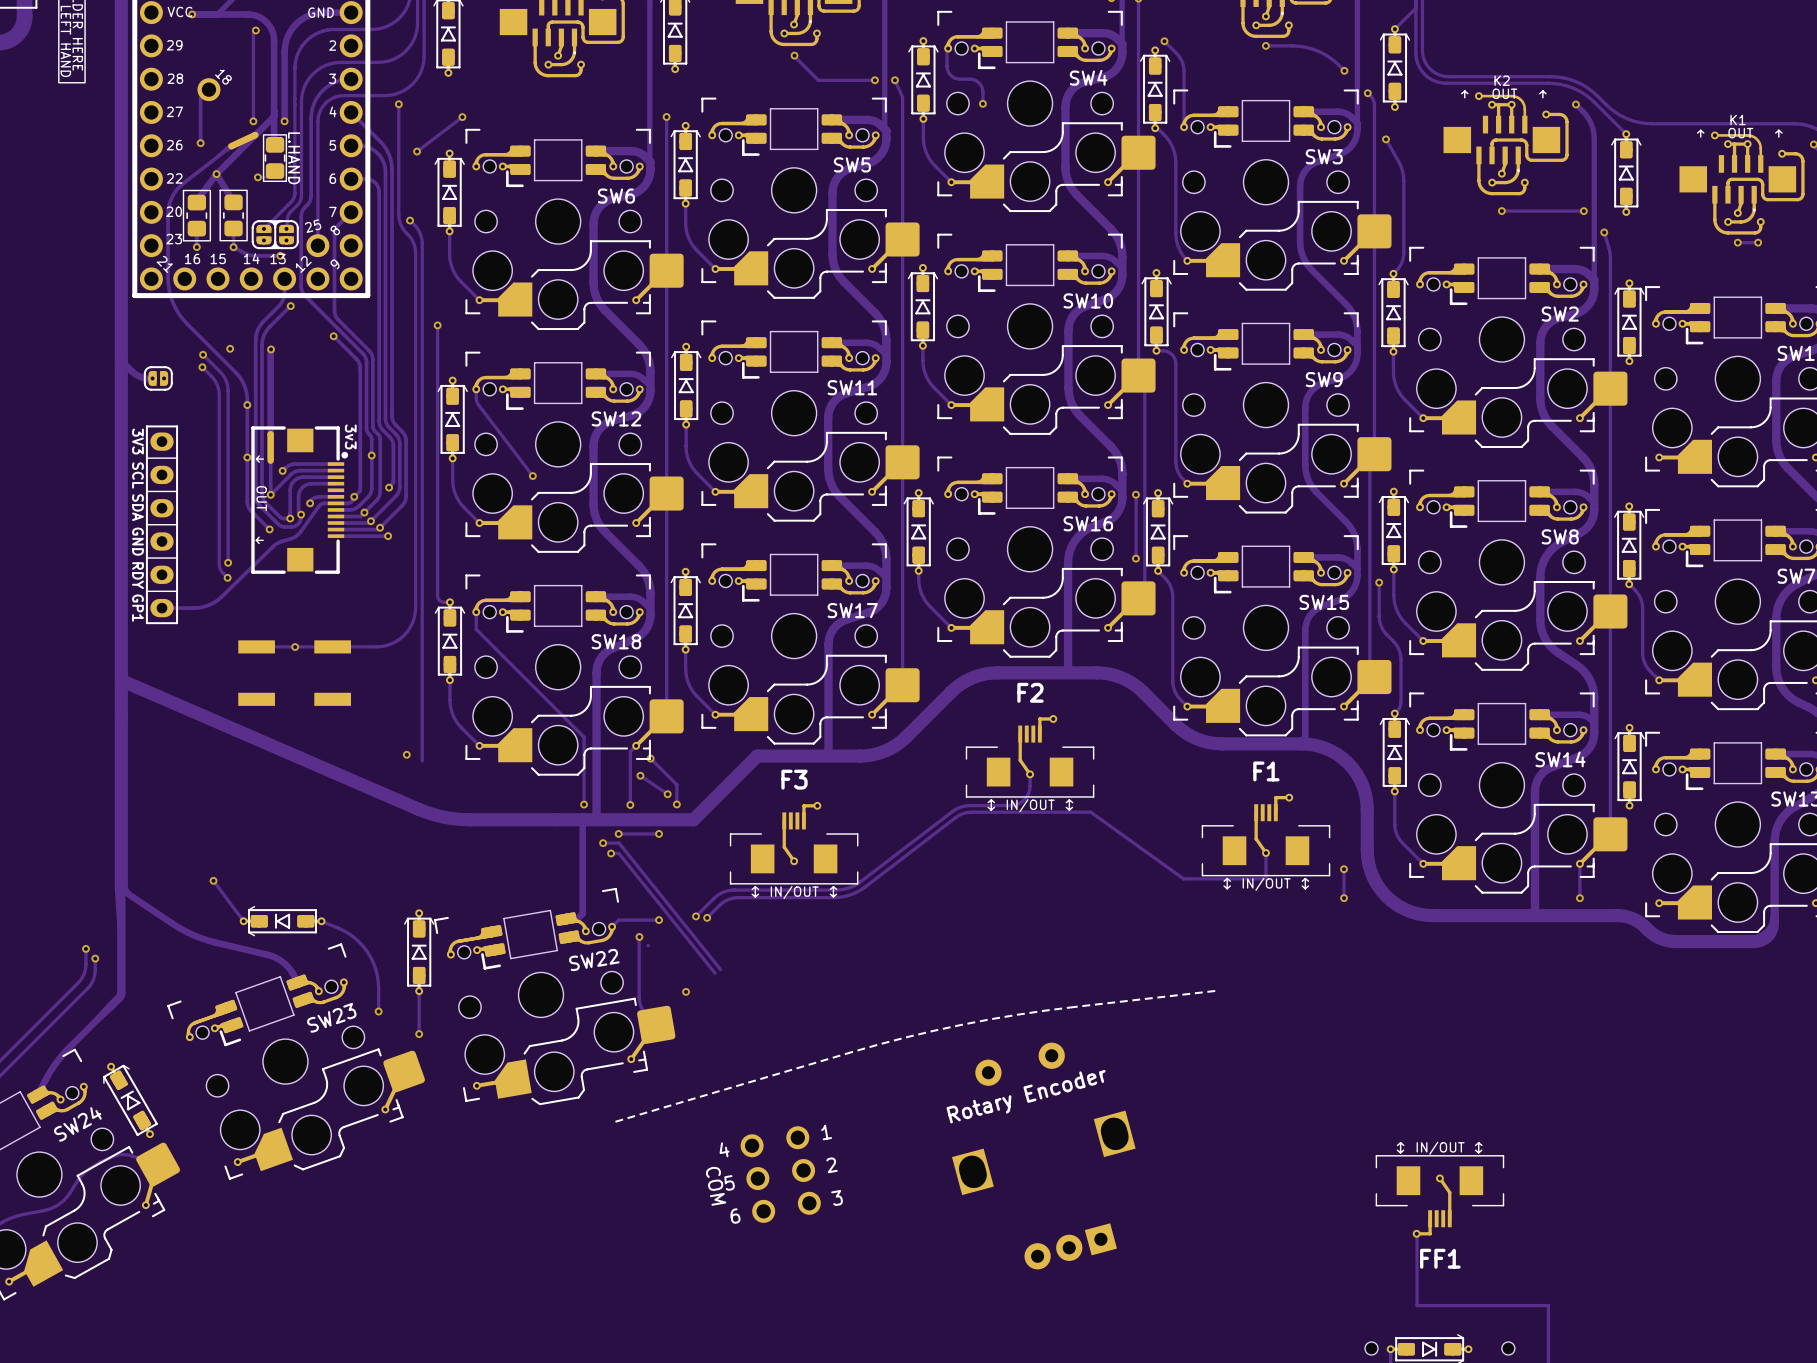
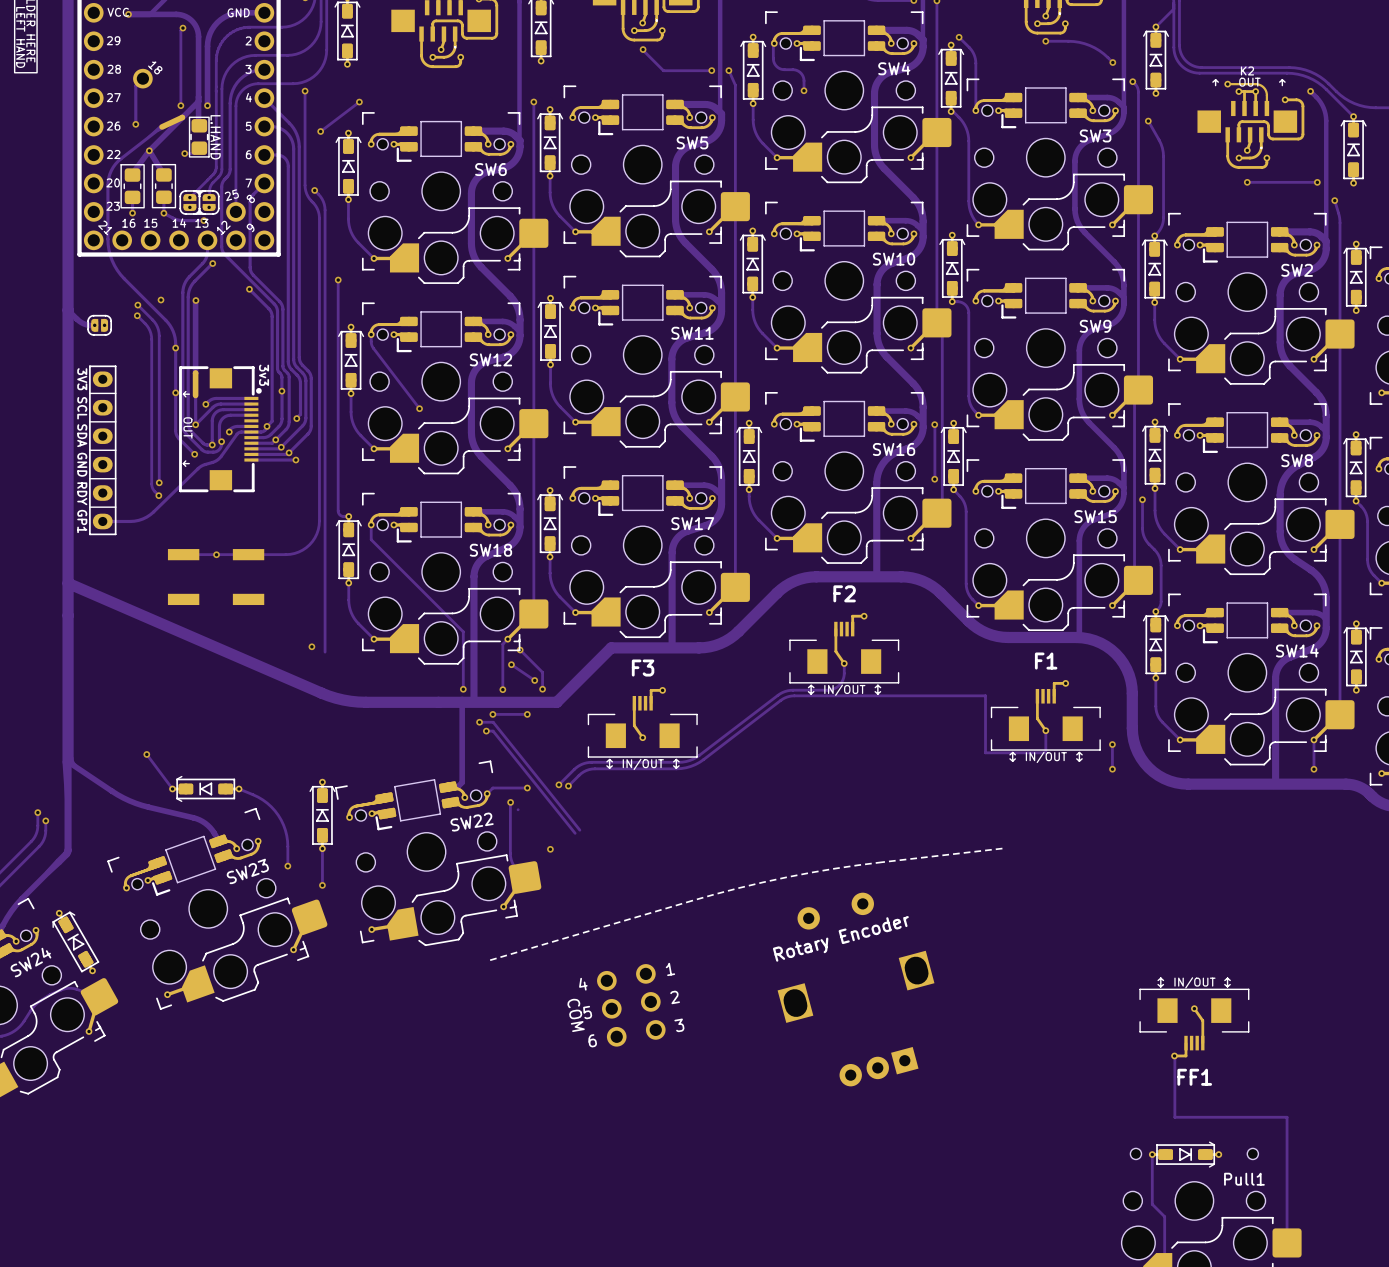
track: (971, 812) (1090, 812) (1183, 878) (1195, 878) -> (794, 695) (985, 695) (985, 752)

